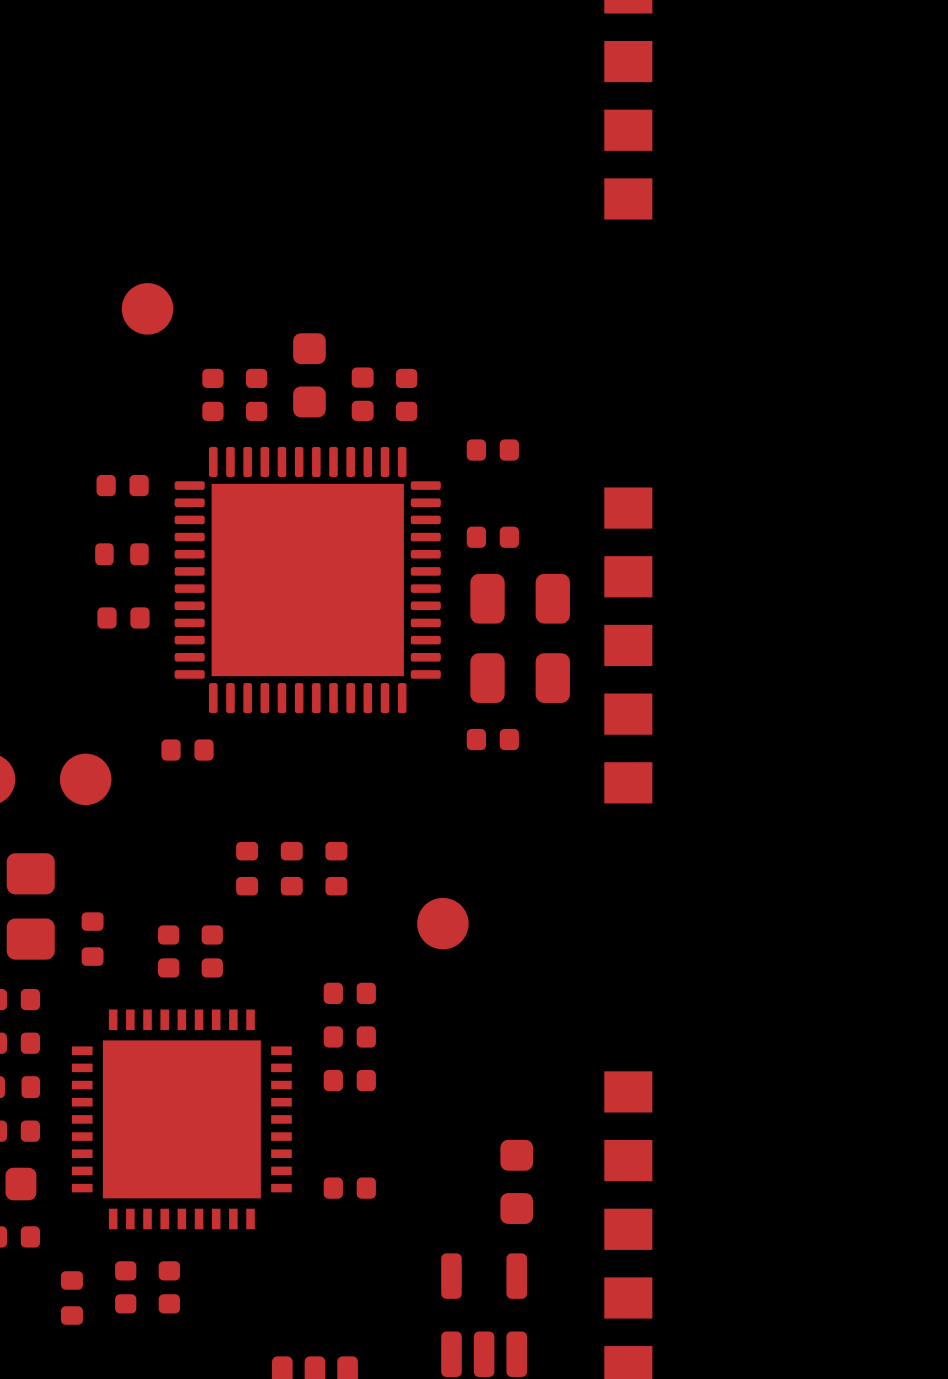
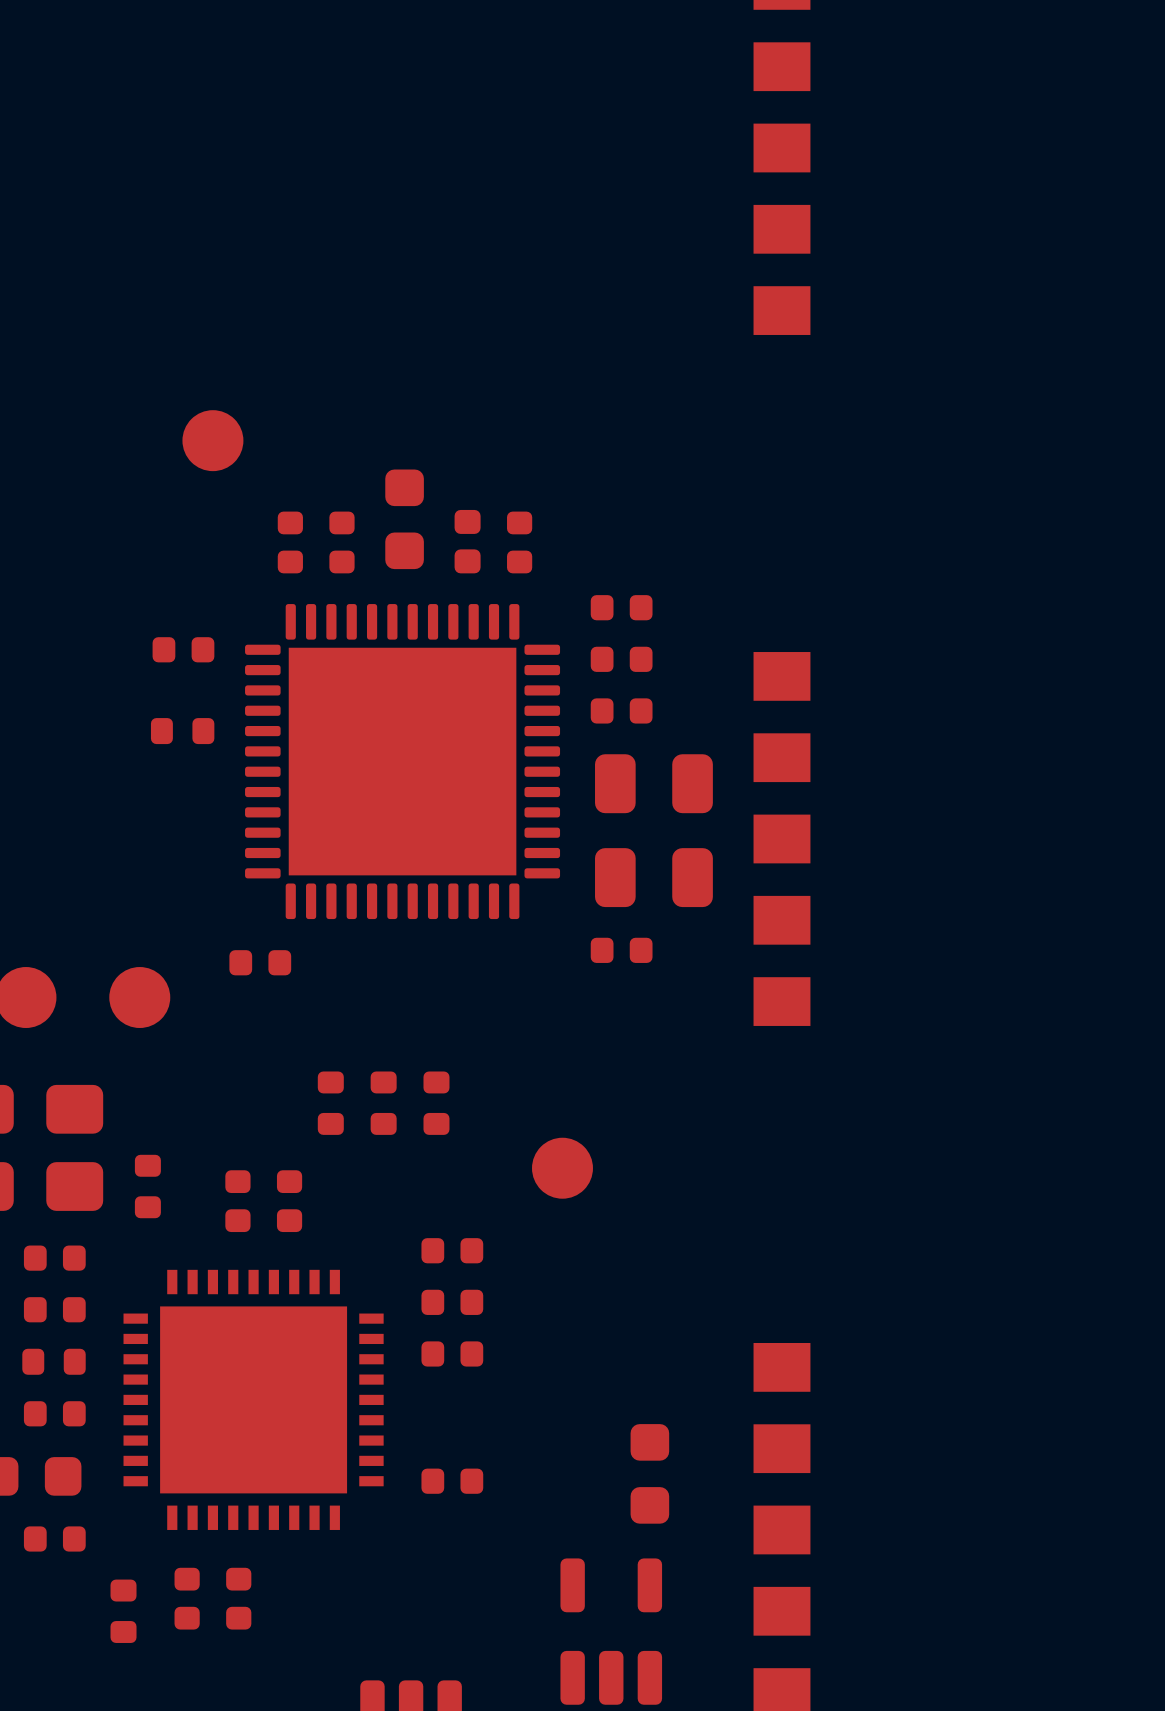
part position: (123, 617) -> (621, 659)

